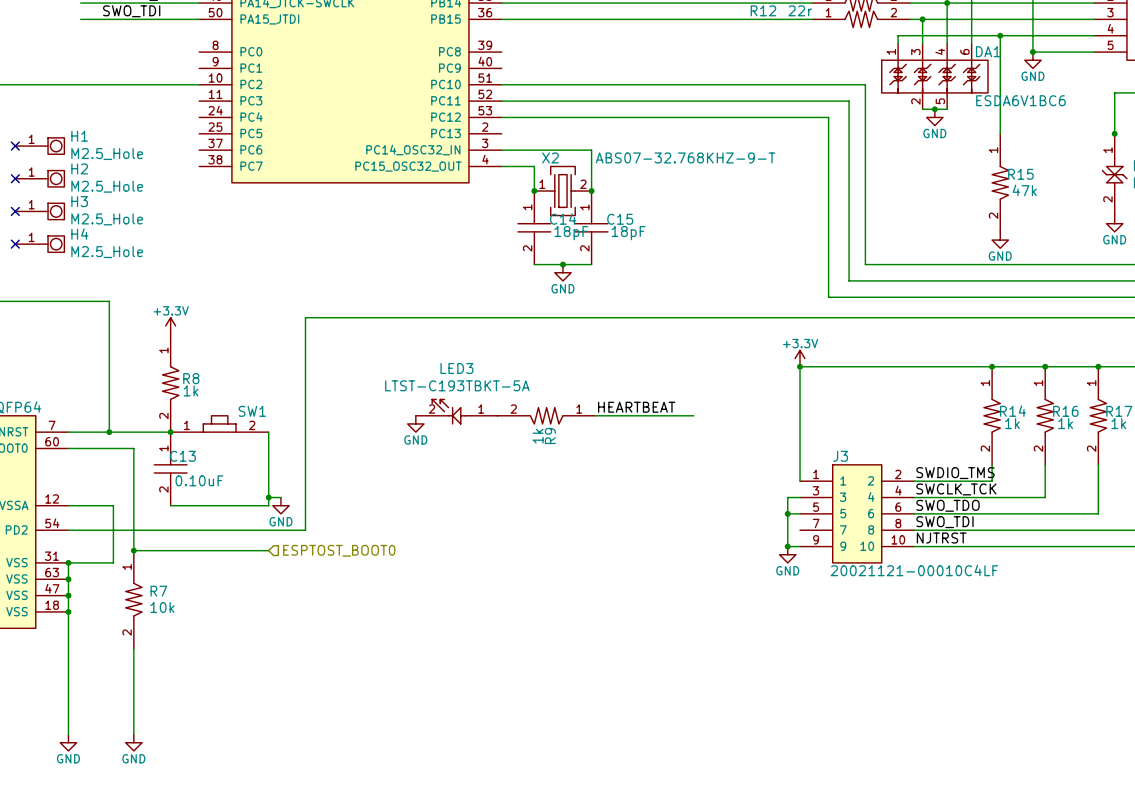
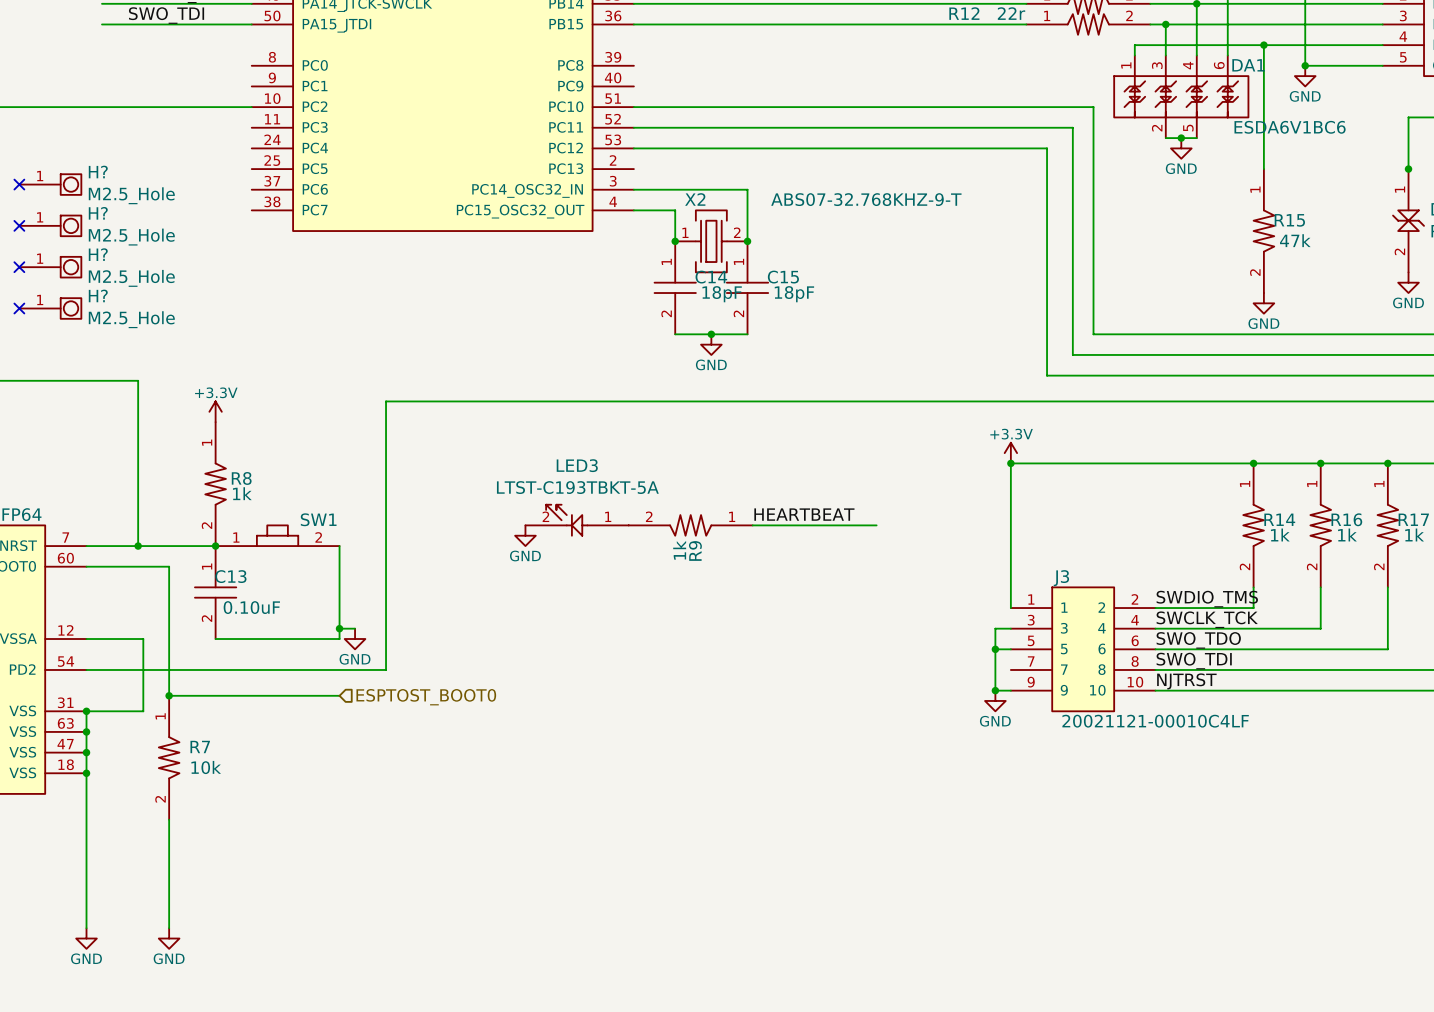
H1 name: H1 (79, 136) -> H? (98, 172)
H2 name: H2 (79, 168) -> H? (98, 213)
H3 name: H3 (79, 201) -> H? (98, 254)
H4 name: H4 (79, 234) -> H? (98, 295)

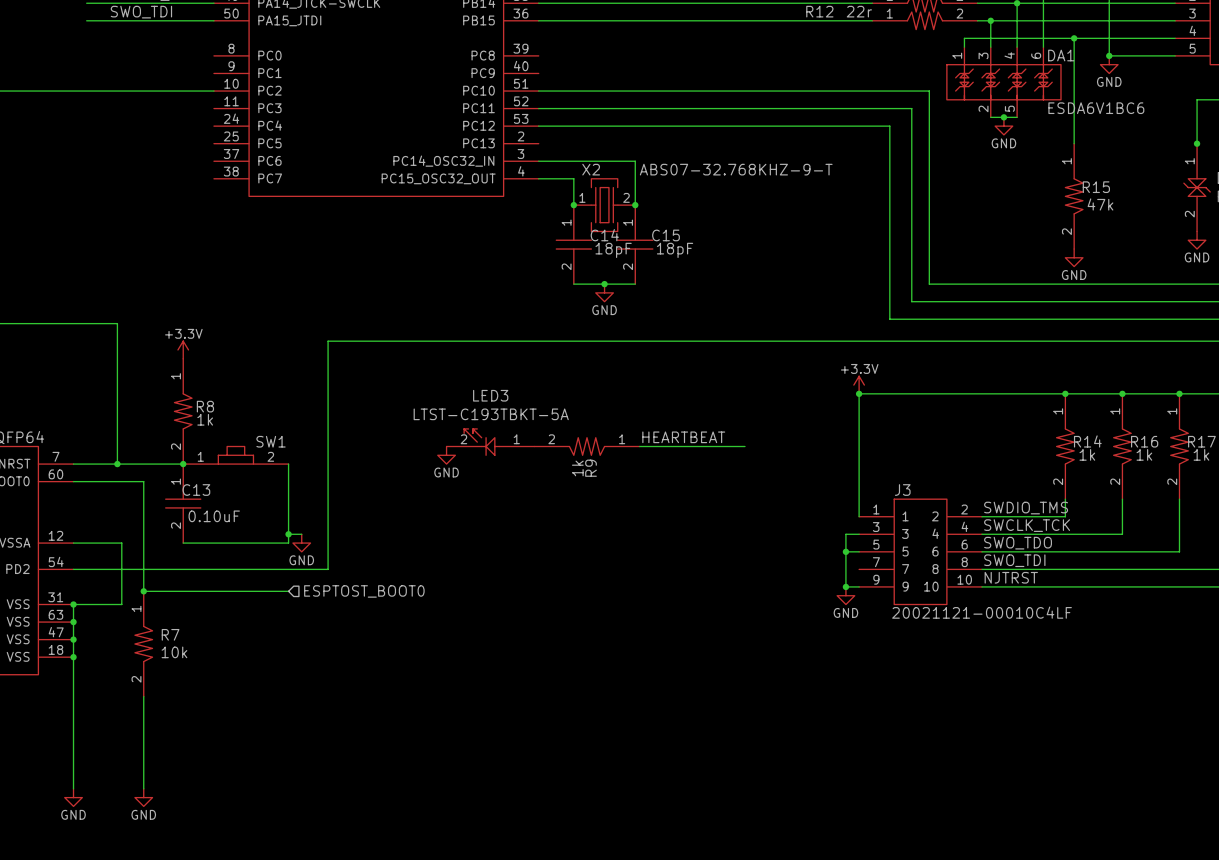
no-connect mark: (19, 184) -> none
H?: M2.5_Hole (50, 184) -> none
no-connect mark: (19, 225) -> none
H?: M2.5_Hole (50, 225) -> none
no-connect mark: (19, 267) -> none
H?: M2.5_Hole (50, 267) -> none
no-connect mark: (19, 308) -> none
H?: M2.5_Hole (50, 308) -> none

